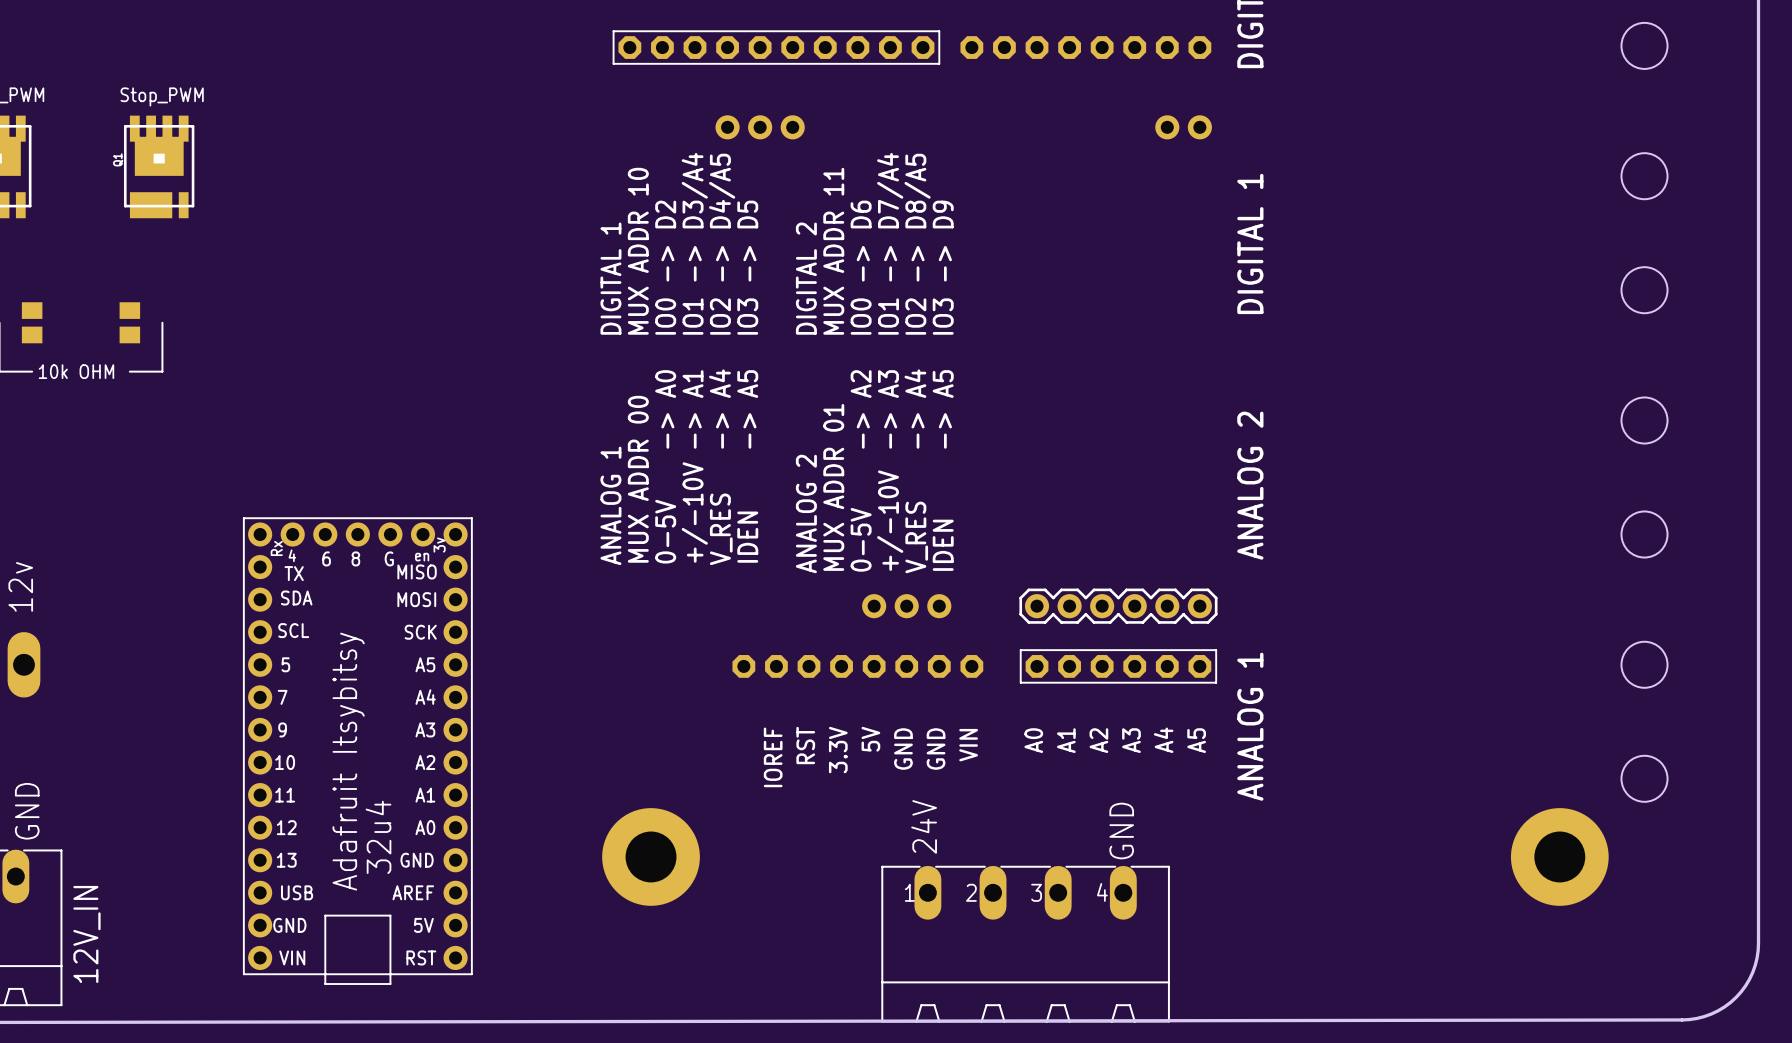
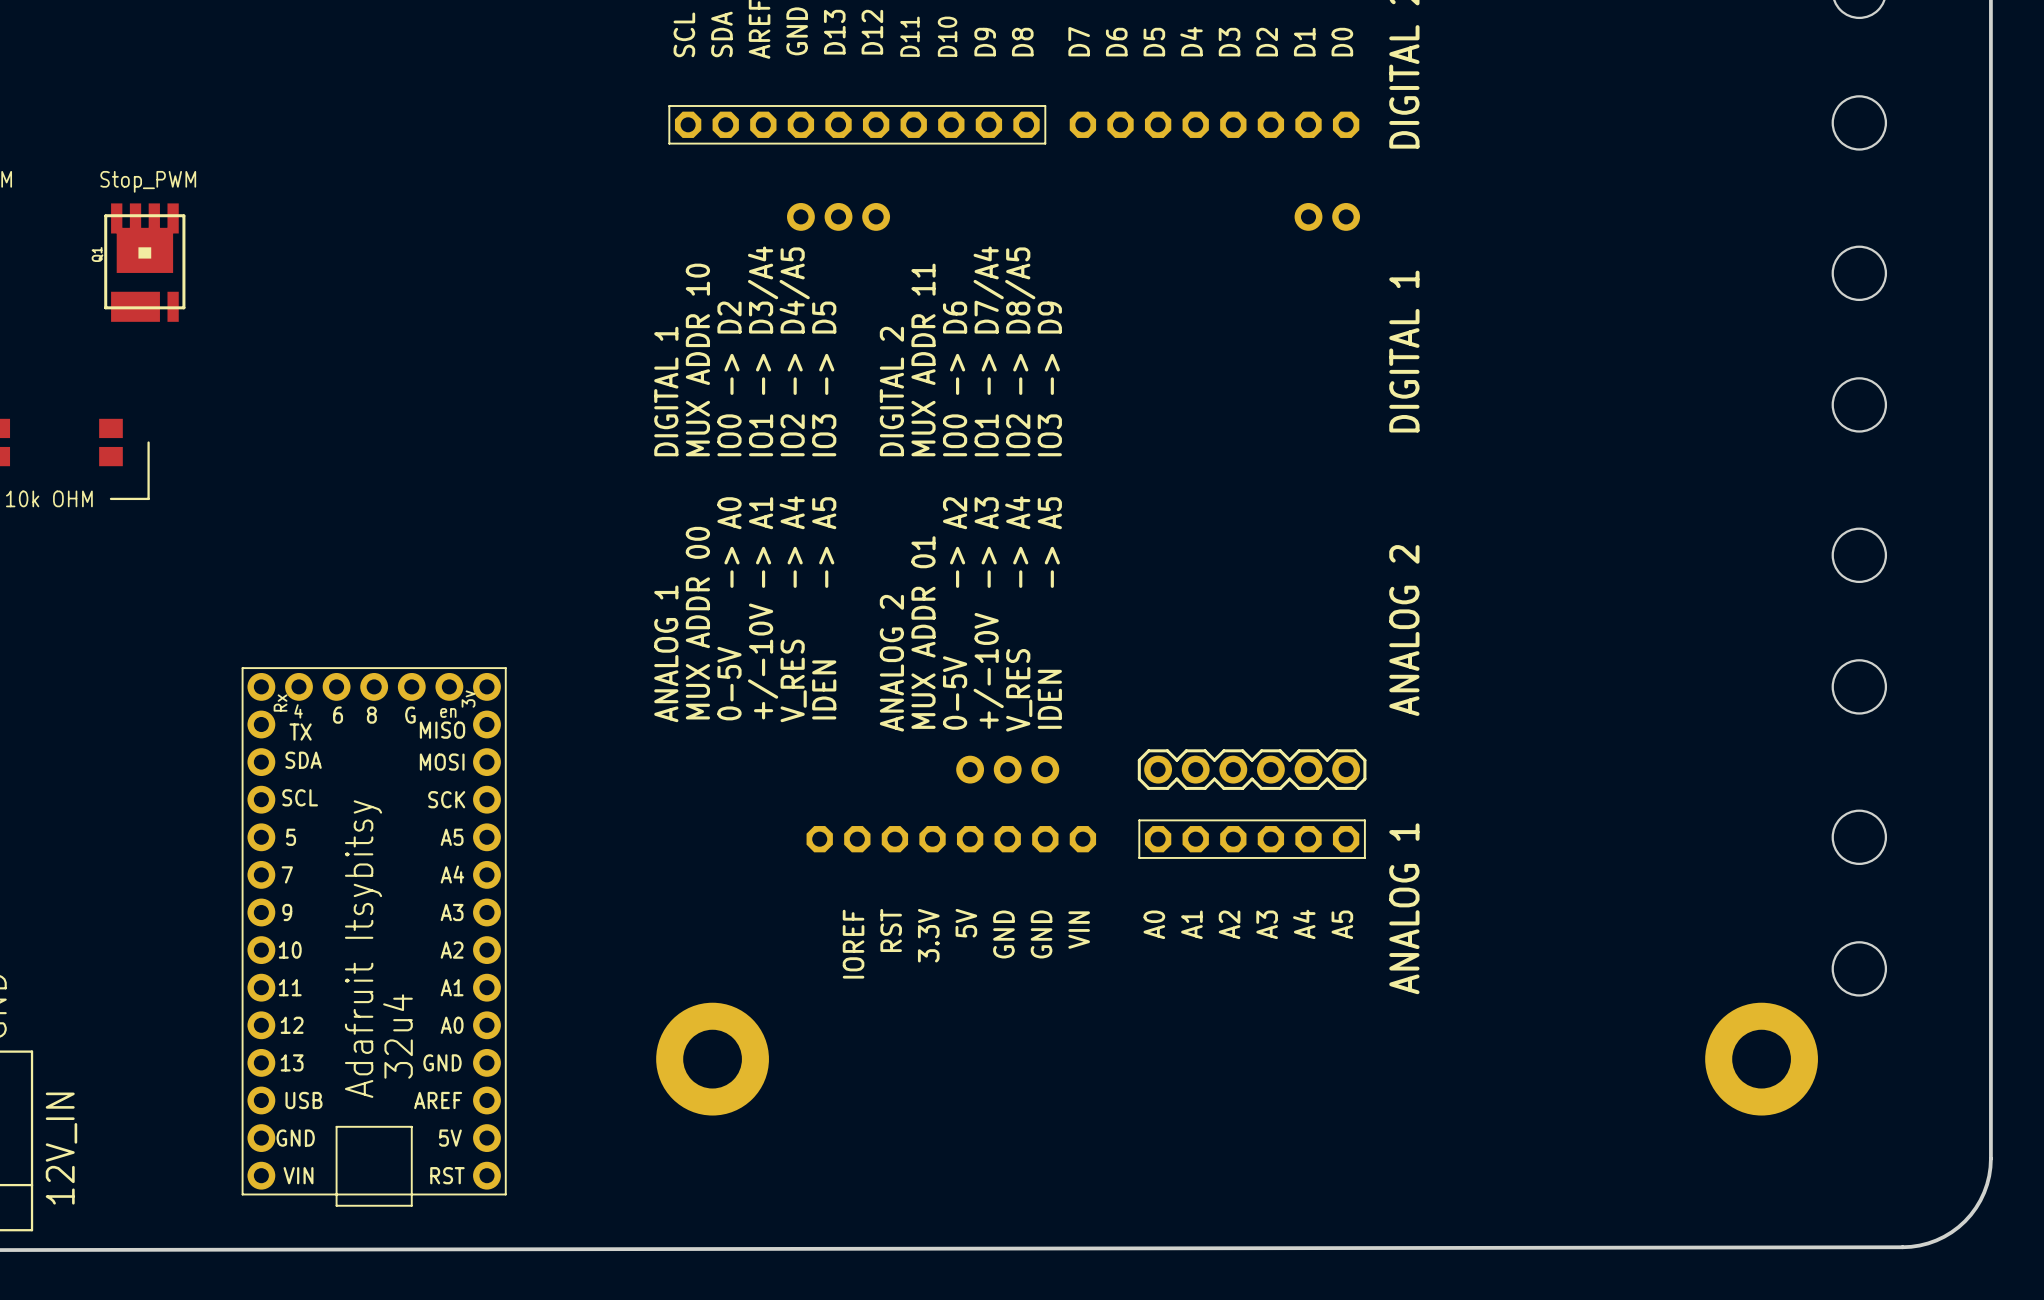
text: 24V (924, 826) -> none
text: GND (1121, 831) -> none
part: (1025, 944) -> none

